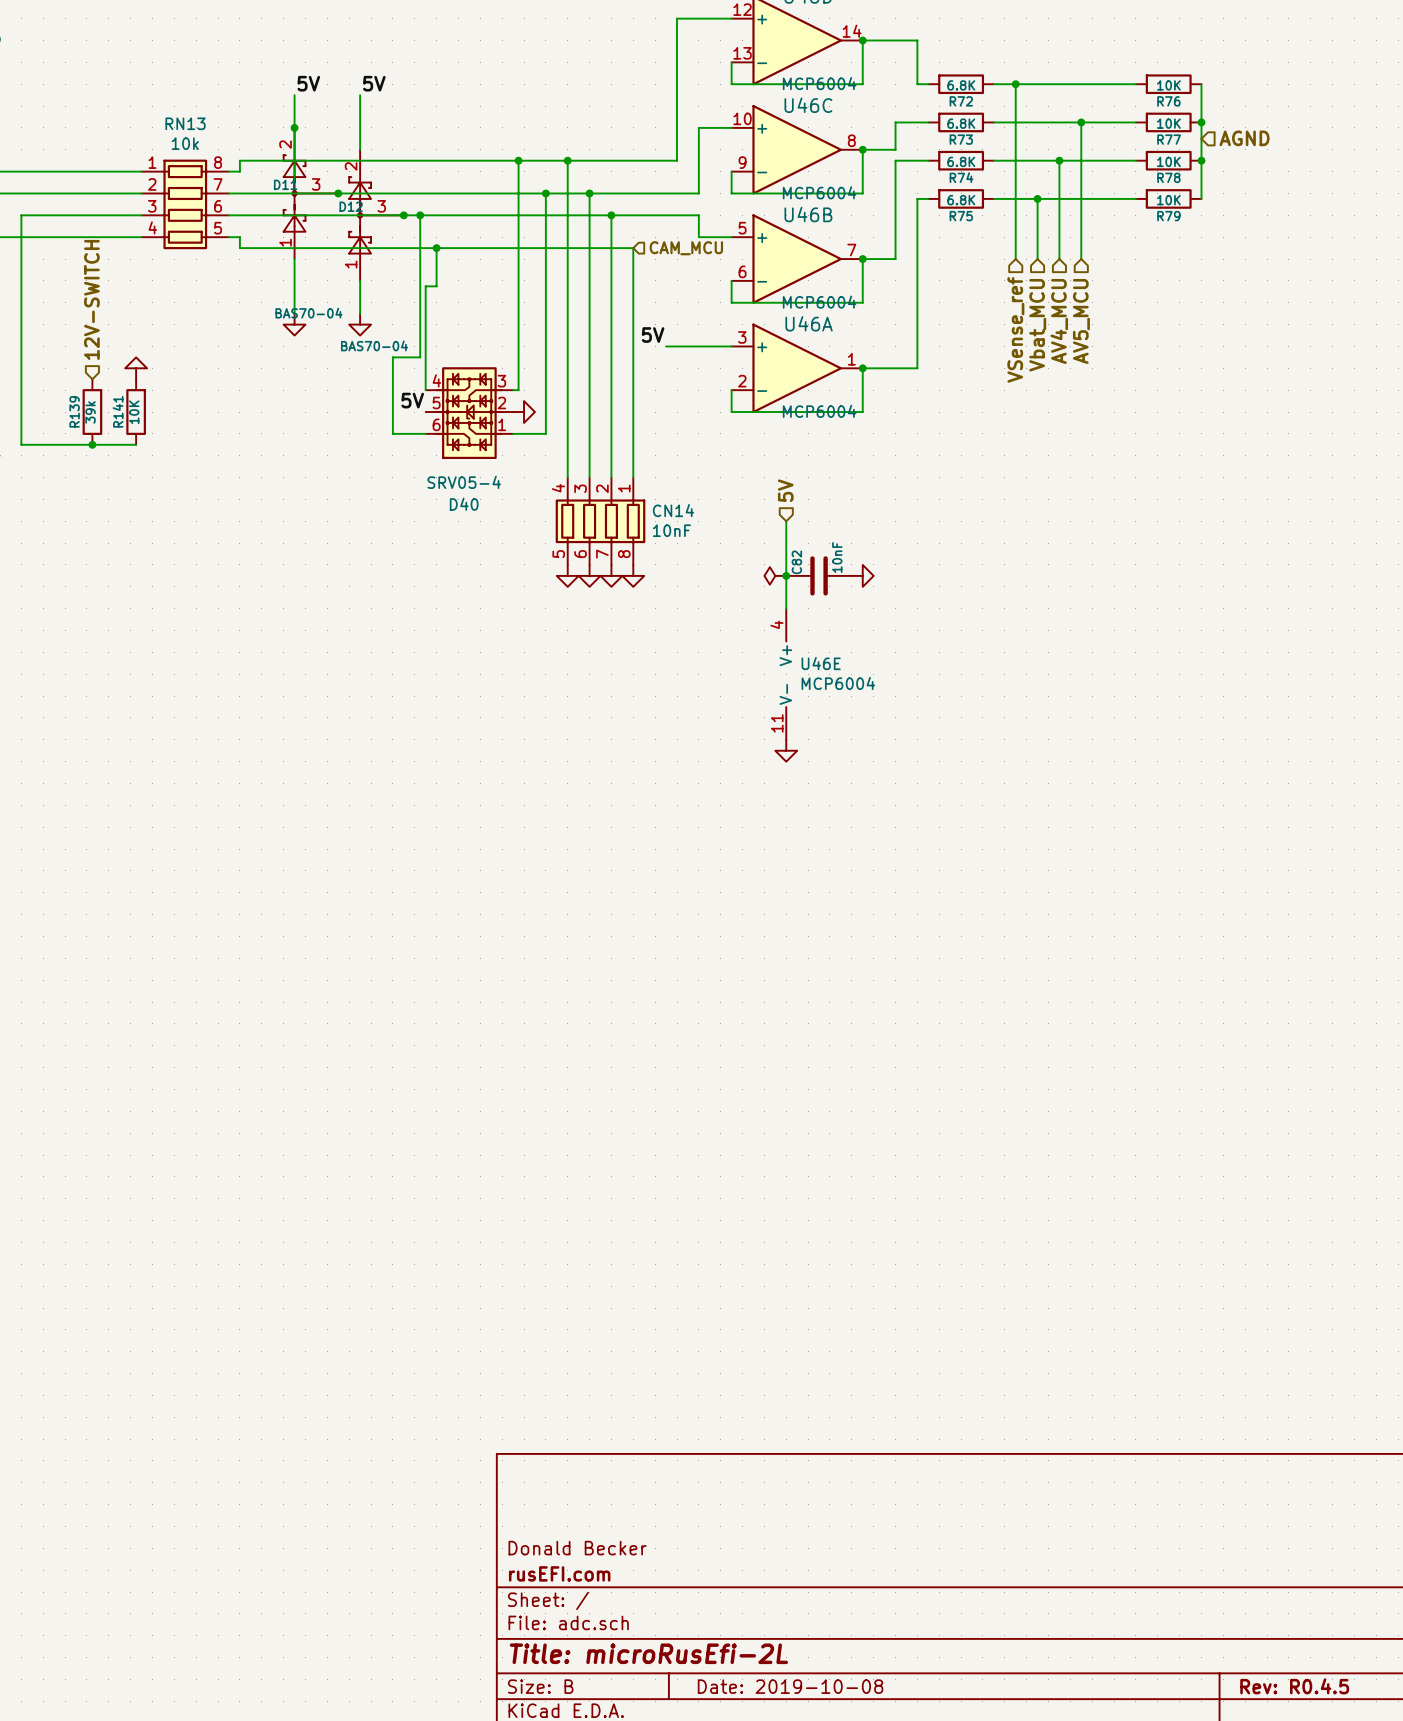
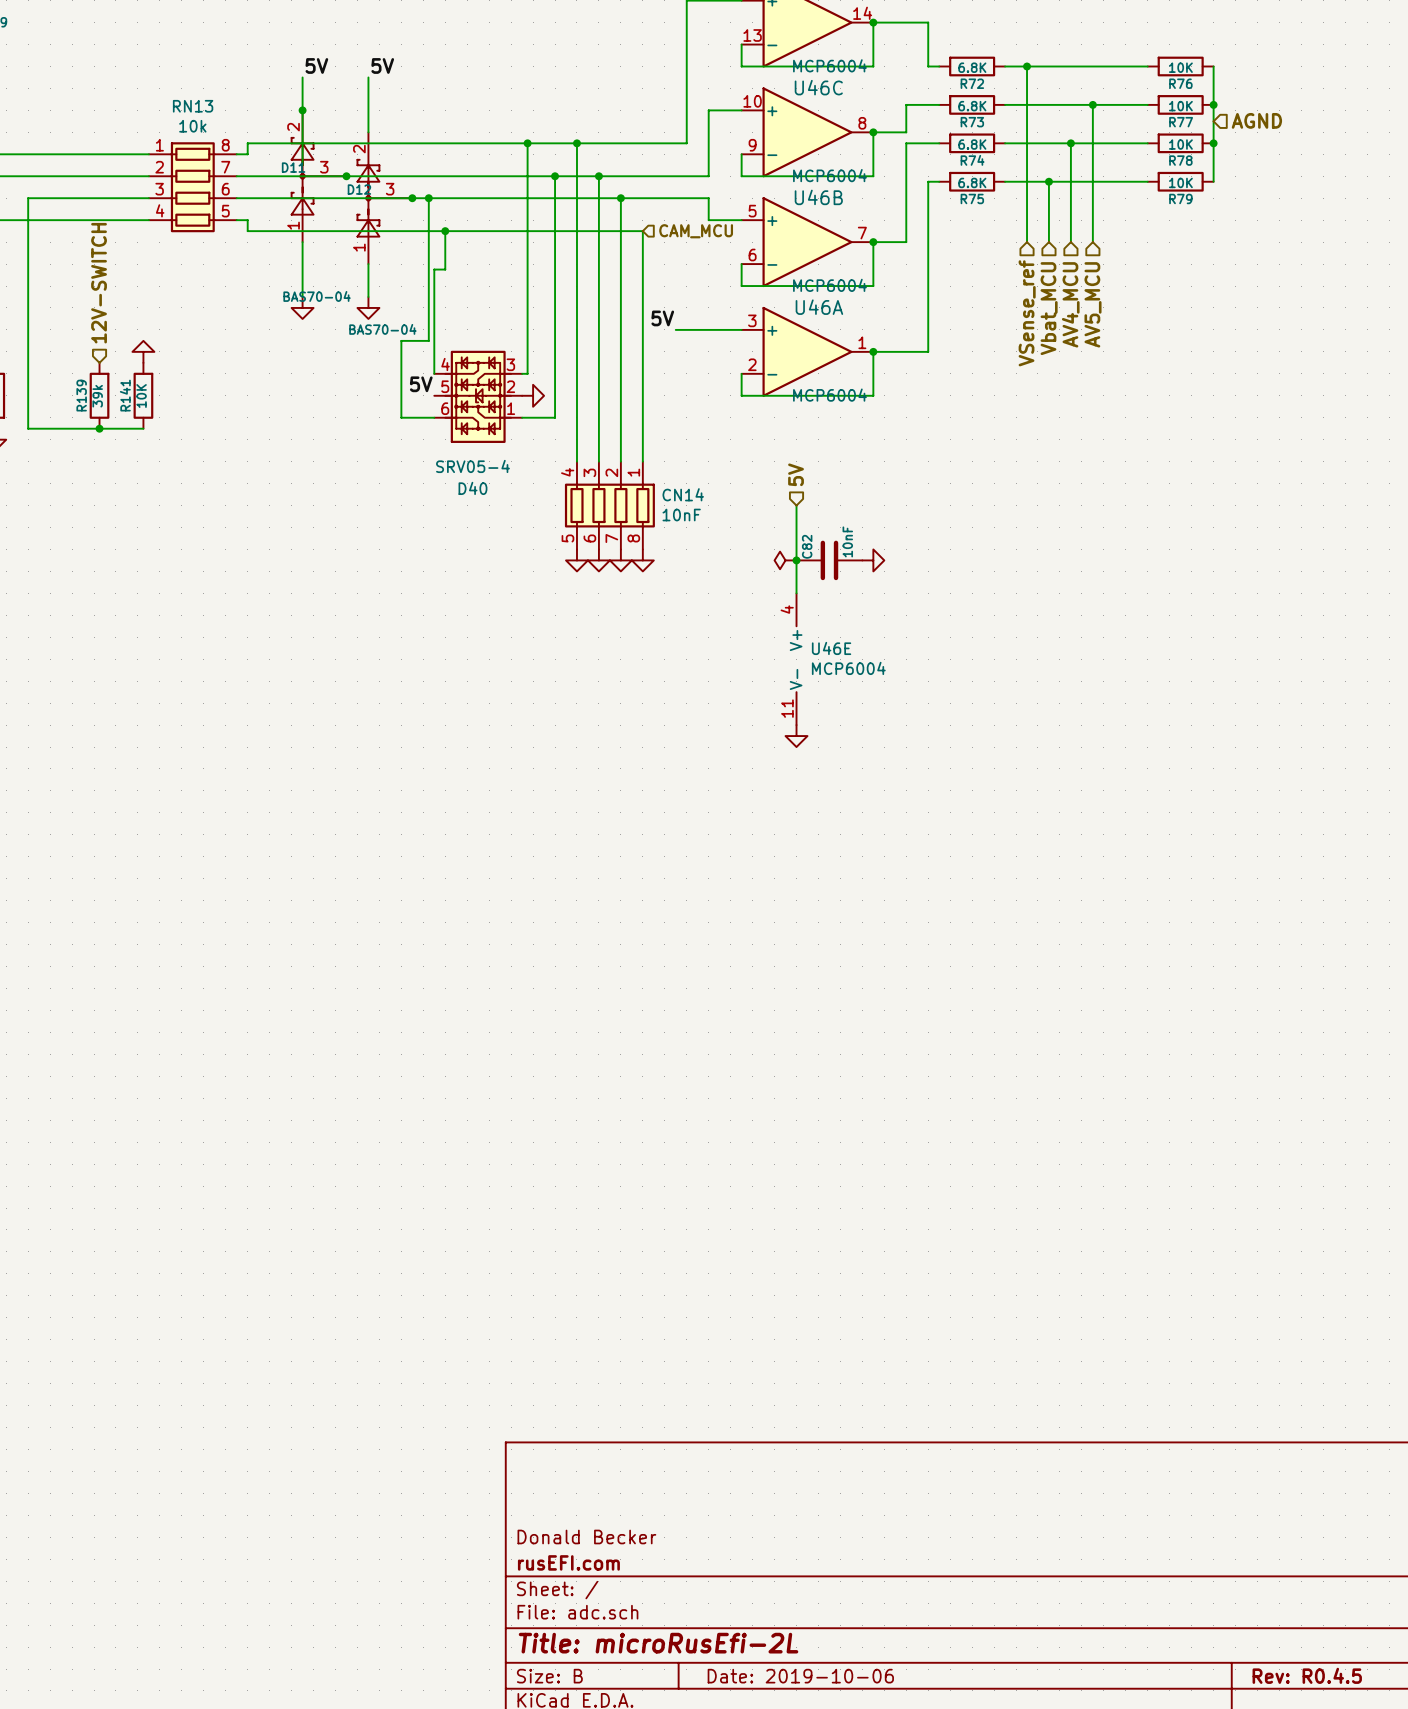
title block: Date: 2019-10-08 (790, 1686) -> Date: 2019-10-06 (800, 1676)

